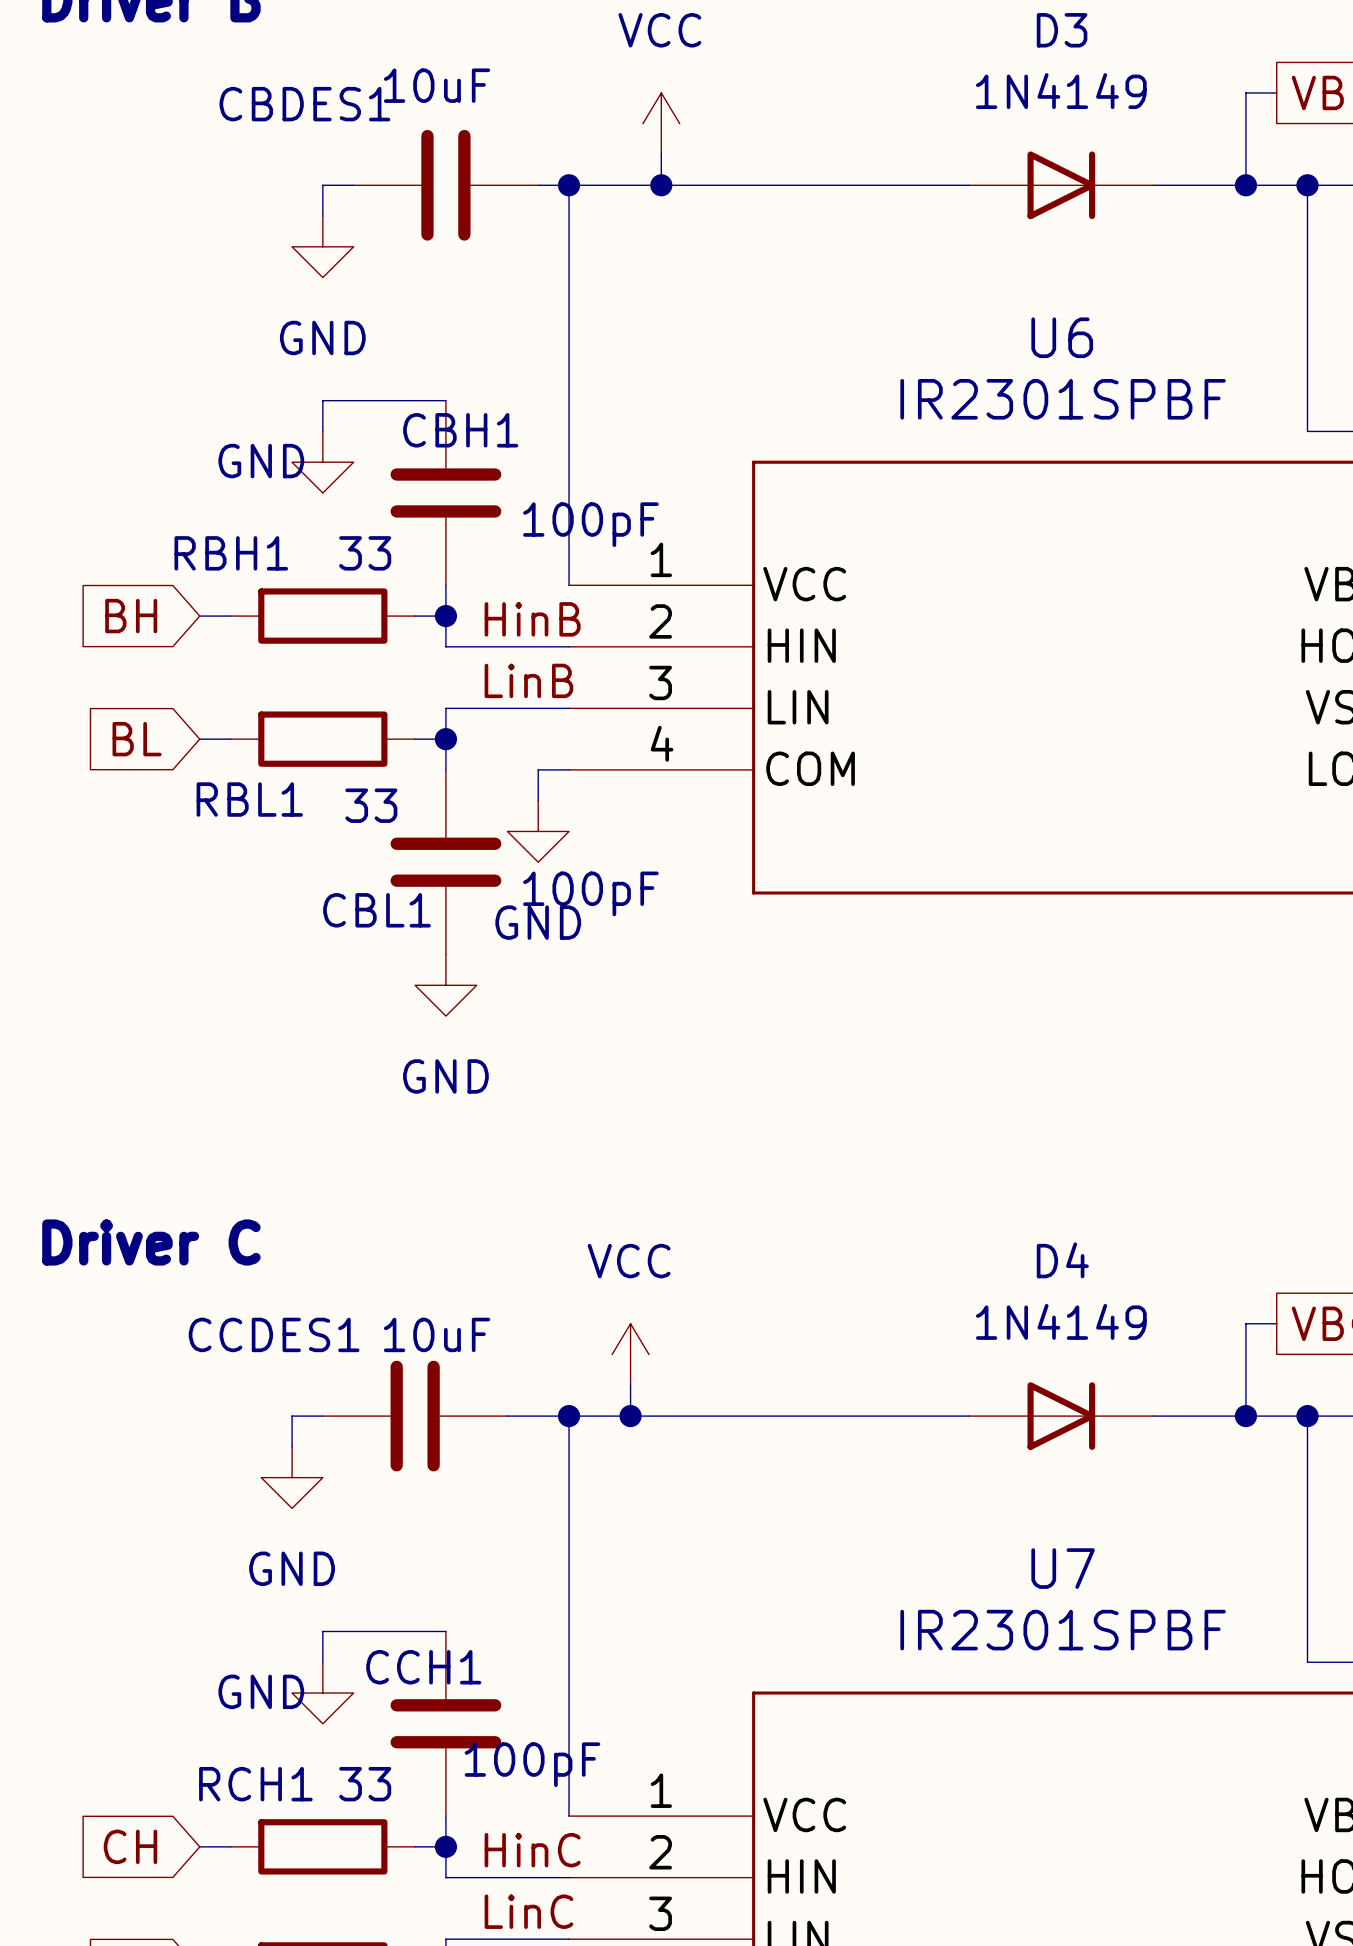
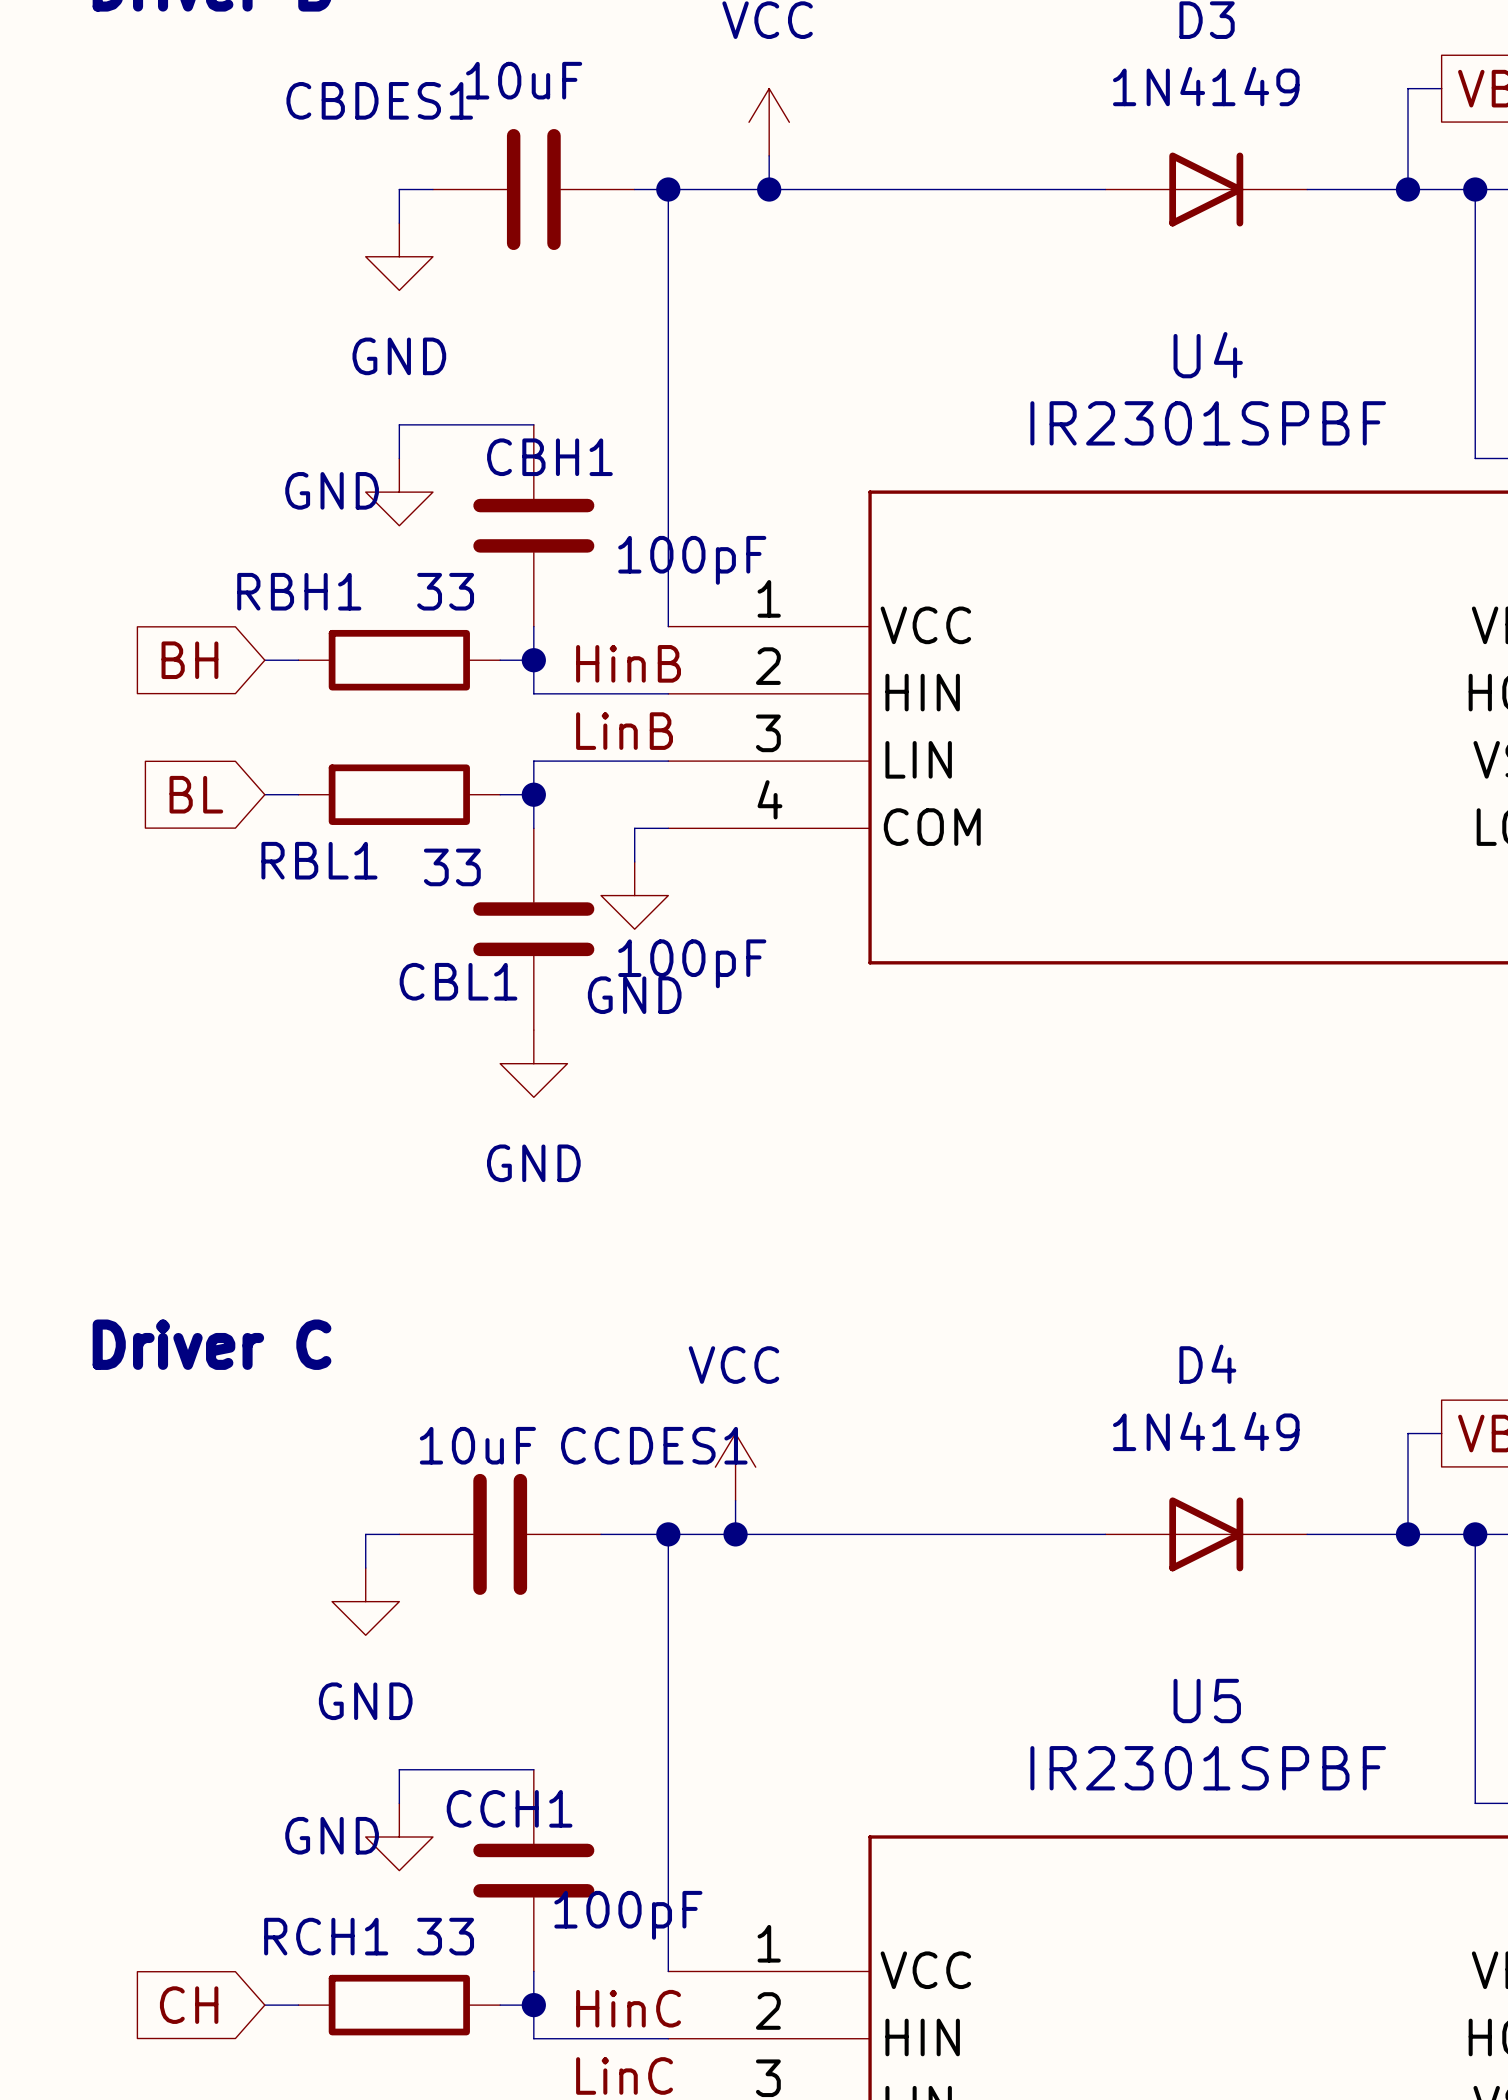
U6 name: U6 (1062, 337) -> U4 (1208, 355)
CCDES1 name position: CCDES1 (274, 1334) -> CCDES1 (654, 1445)
CCDES1 value position: 10uF (437, 1334) -> 10uF (477, 1445)
U7 name: U7 (1063, 1568) -> U5 (1207, 1701)

